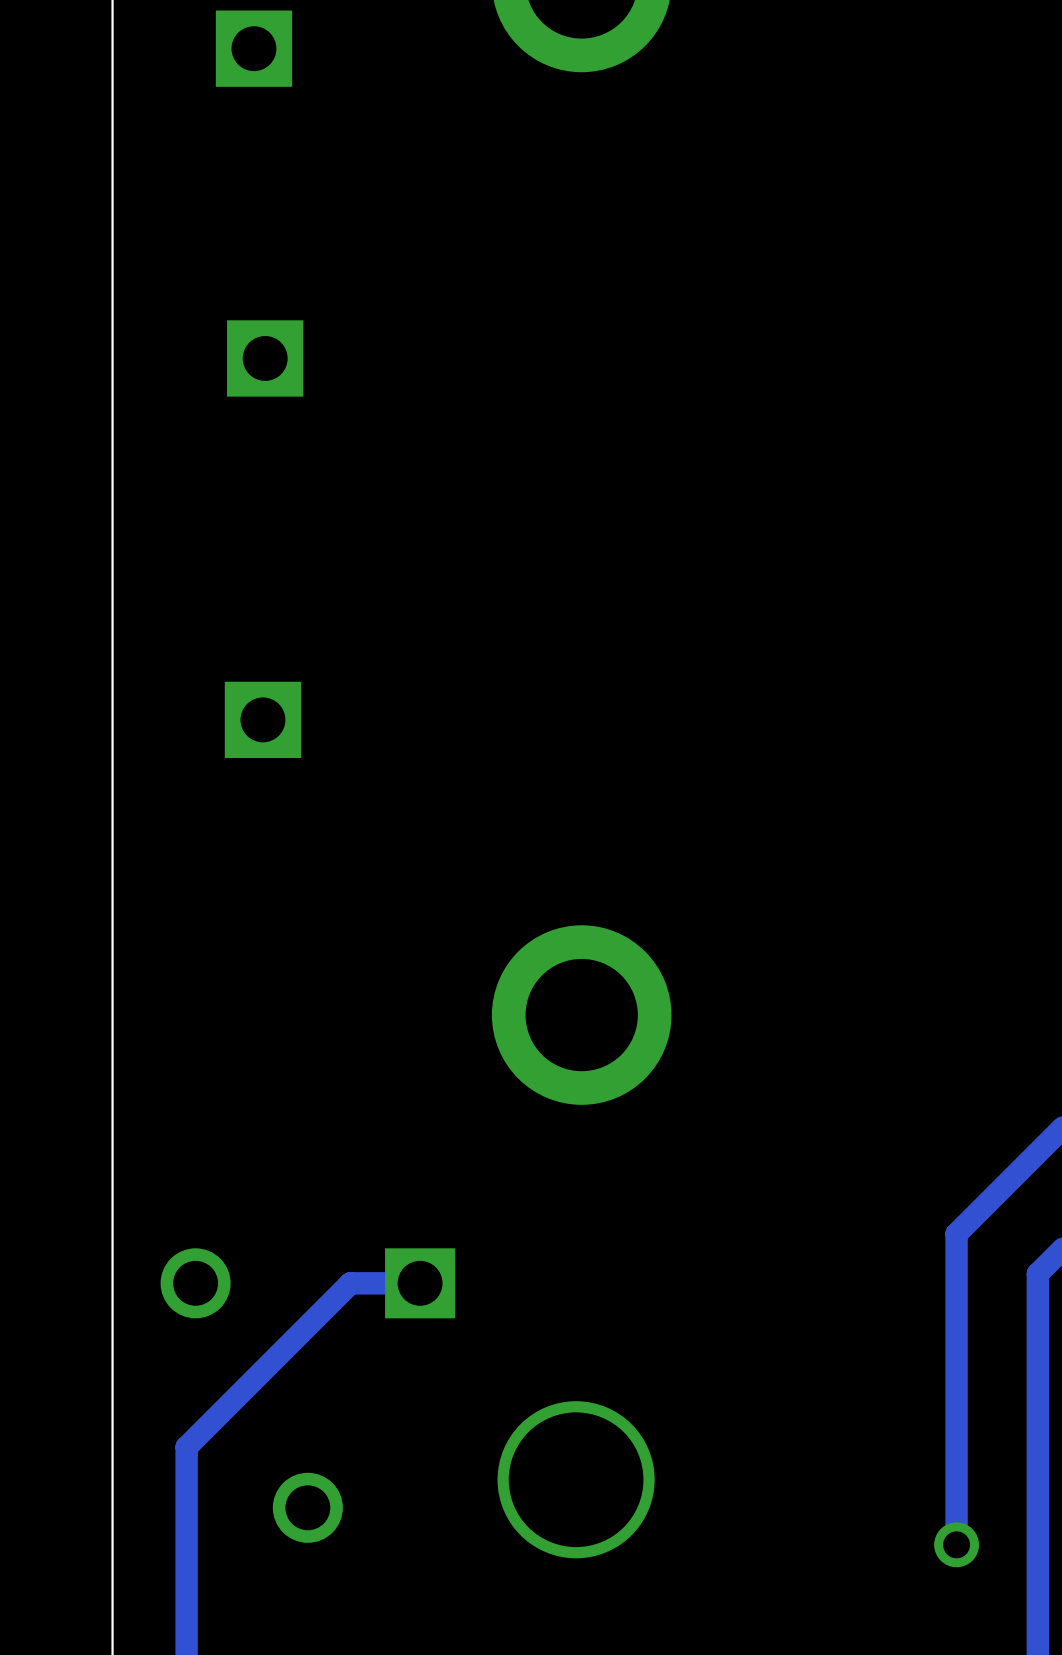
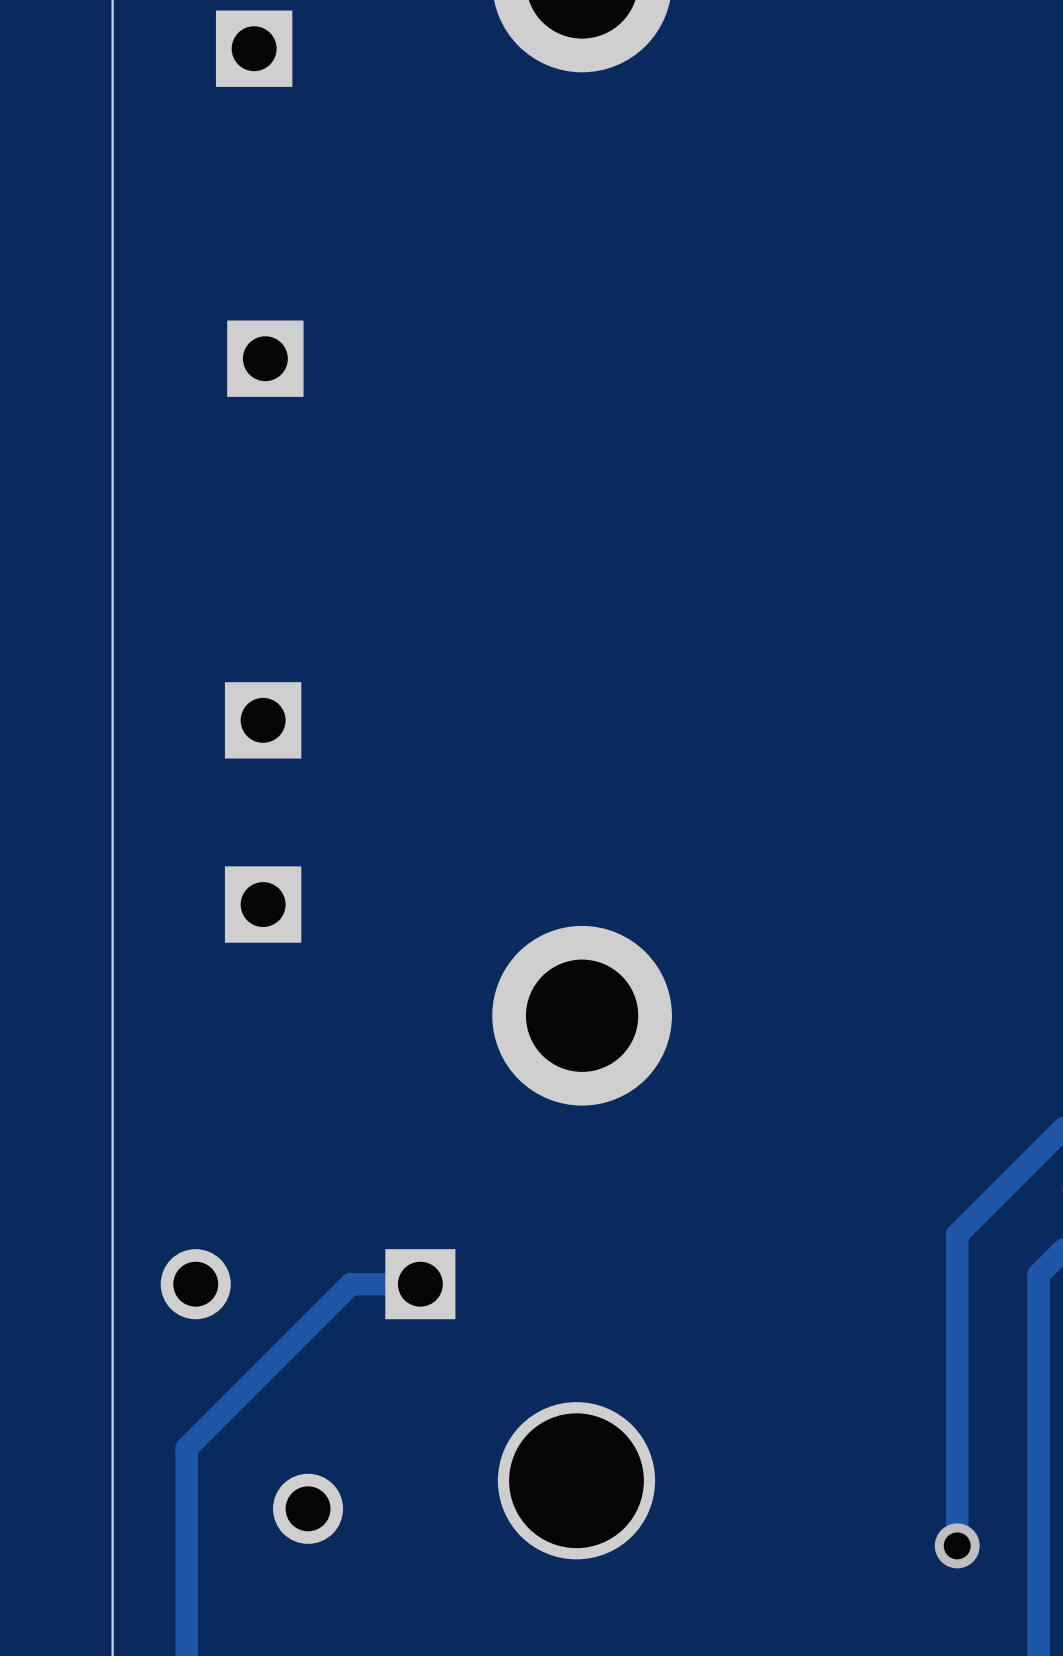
part: none -> (263, 904)

